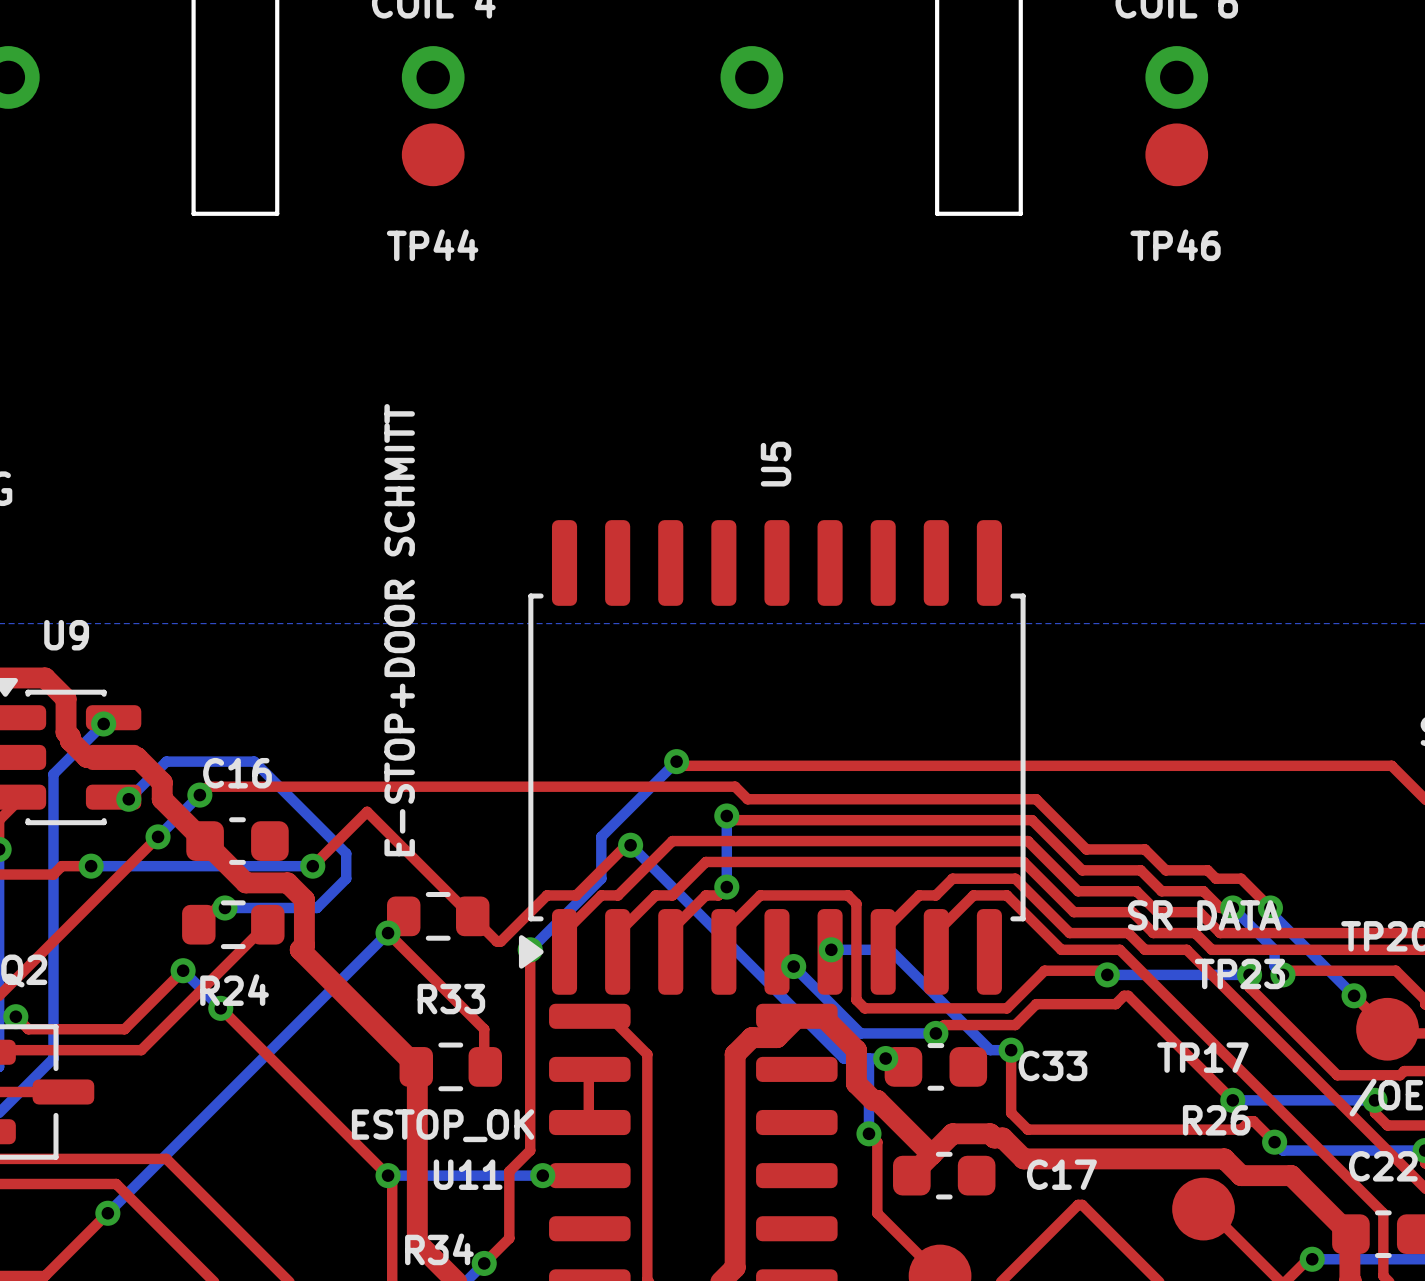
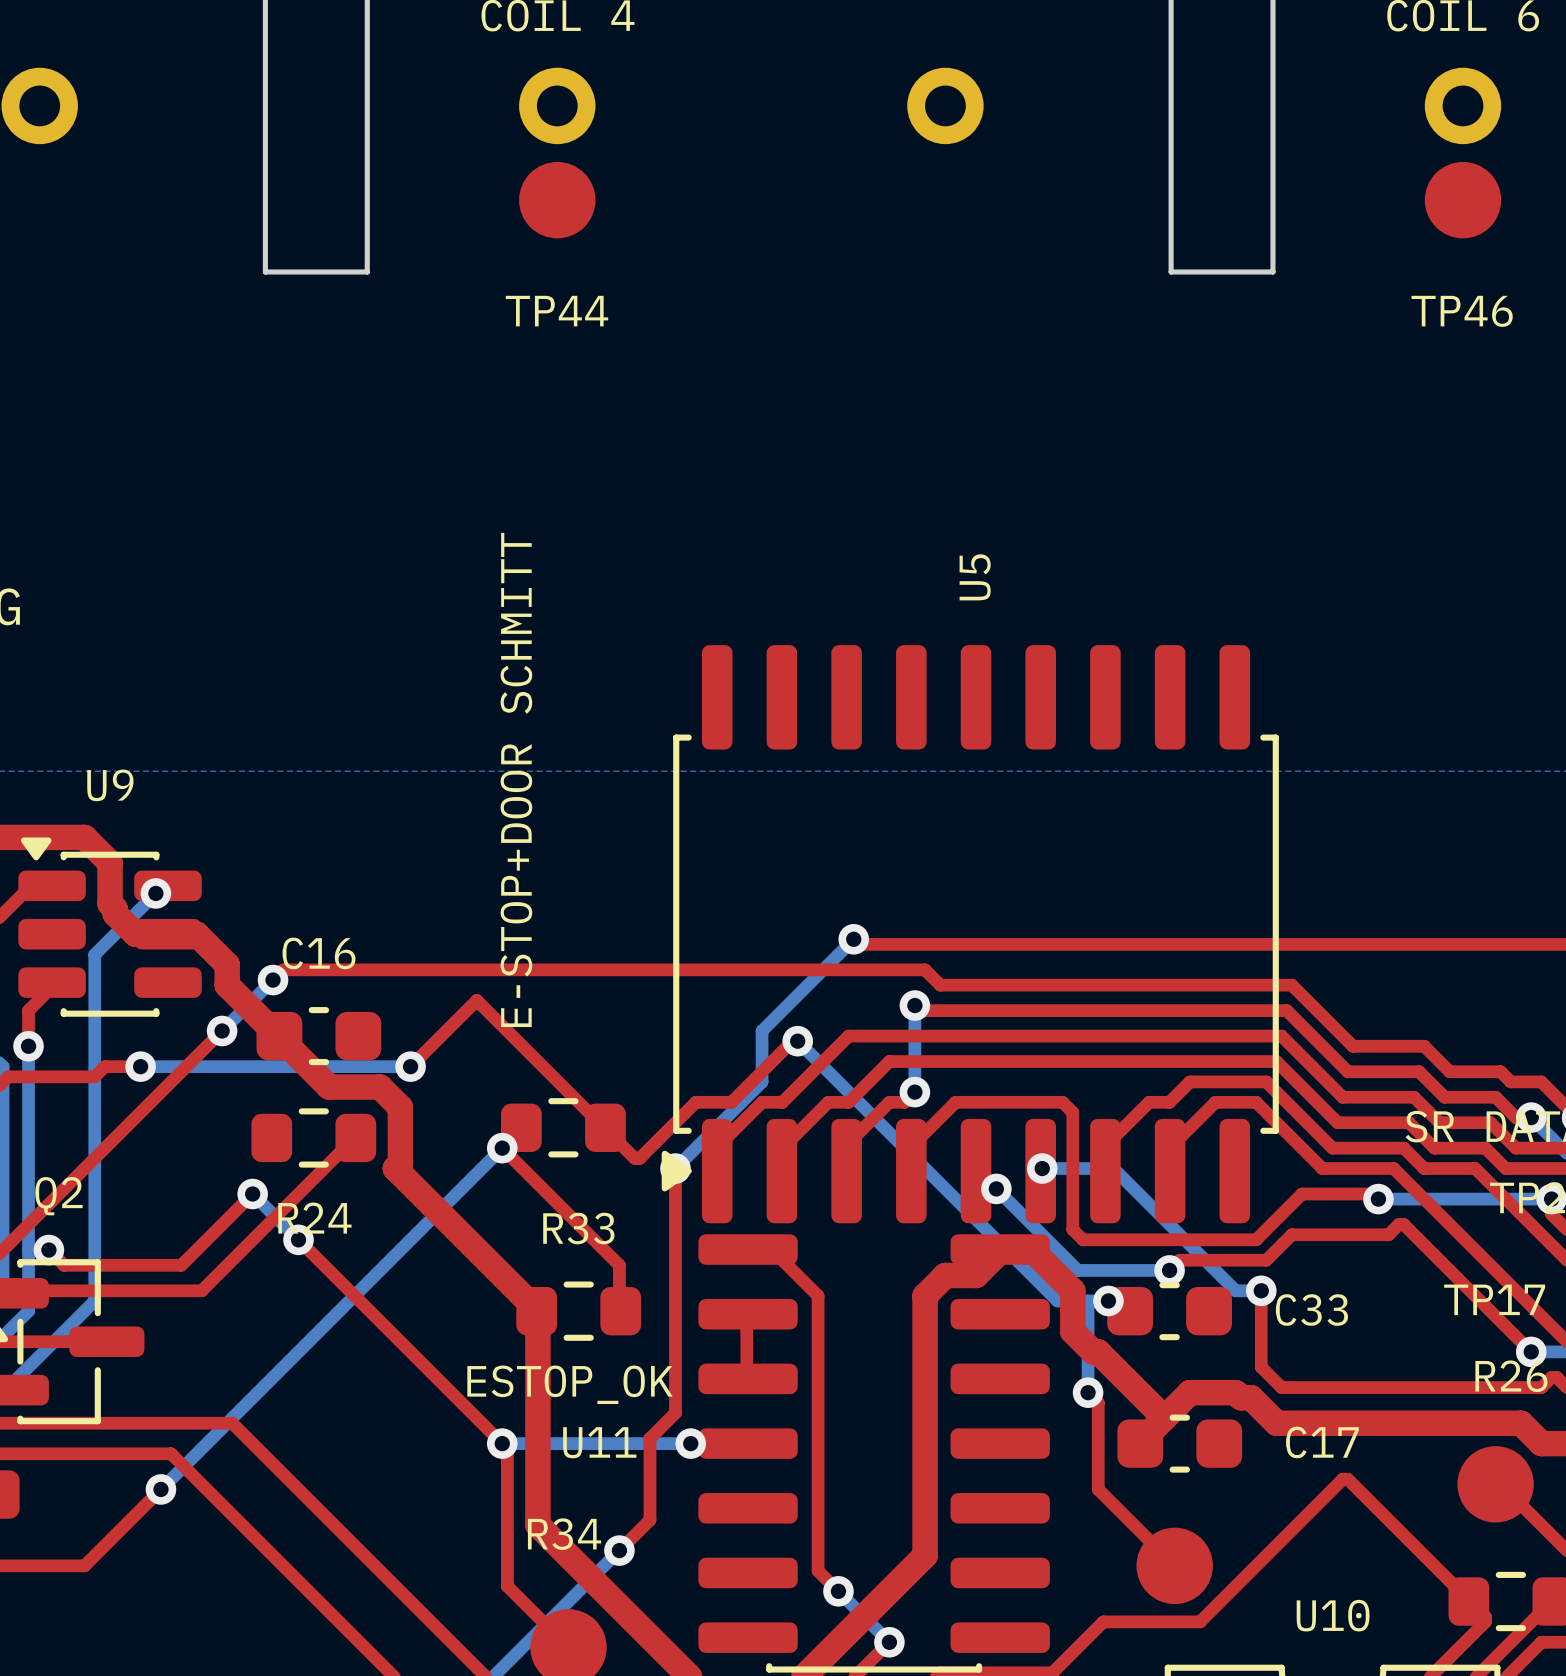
bottom track: (128, 799) (166, 761) (254, 761) (346, 853) (346, 878) (316, 907) (224, 907) -> none
via: (128, 799) -> none
via: (224, 907) -> none

